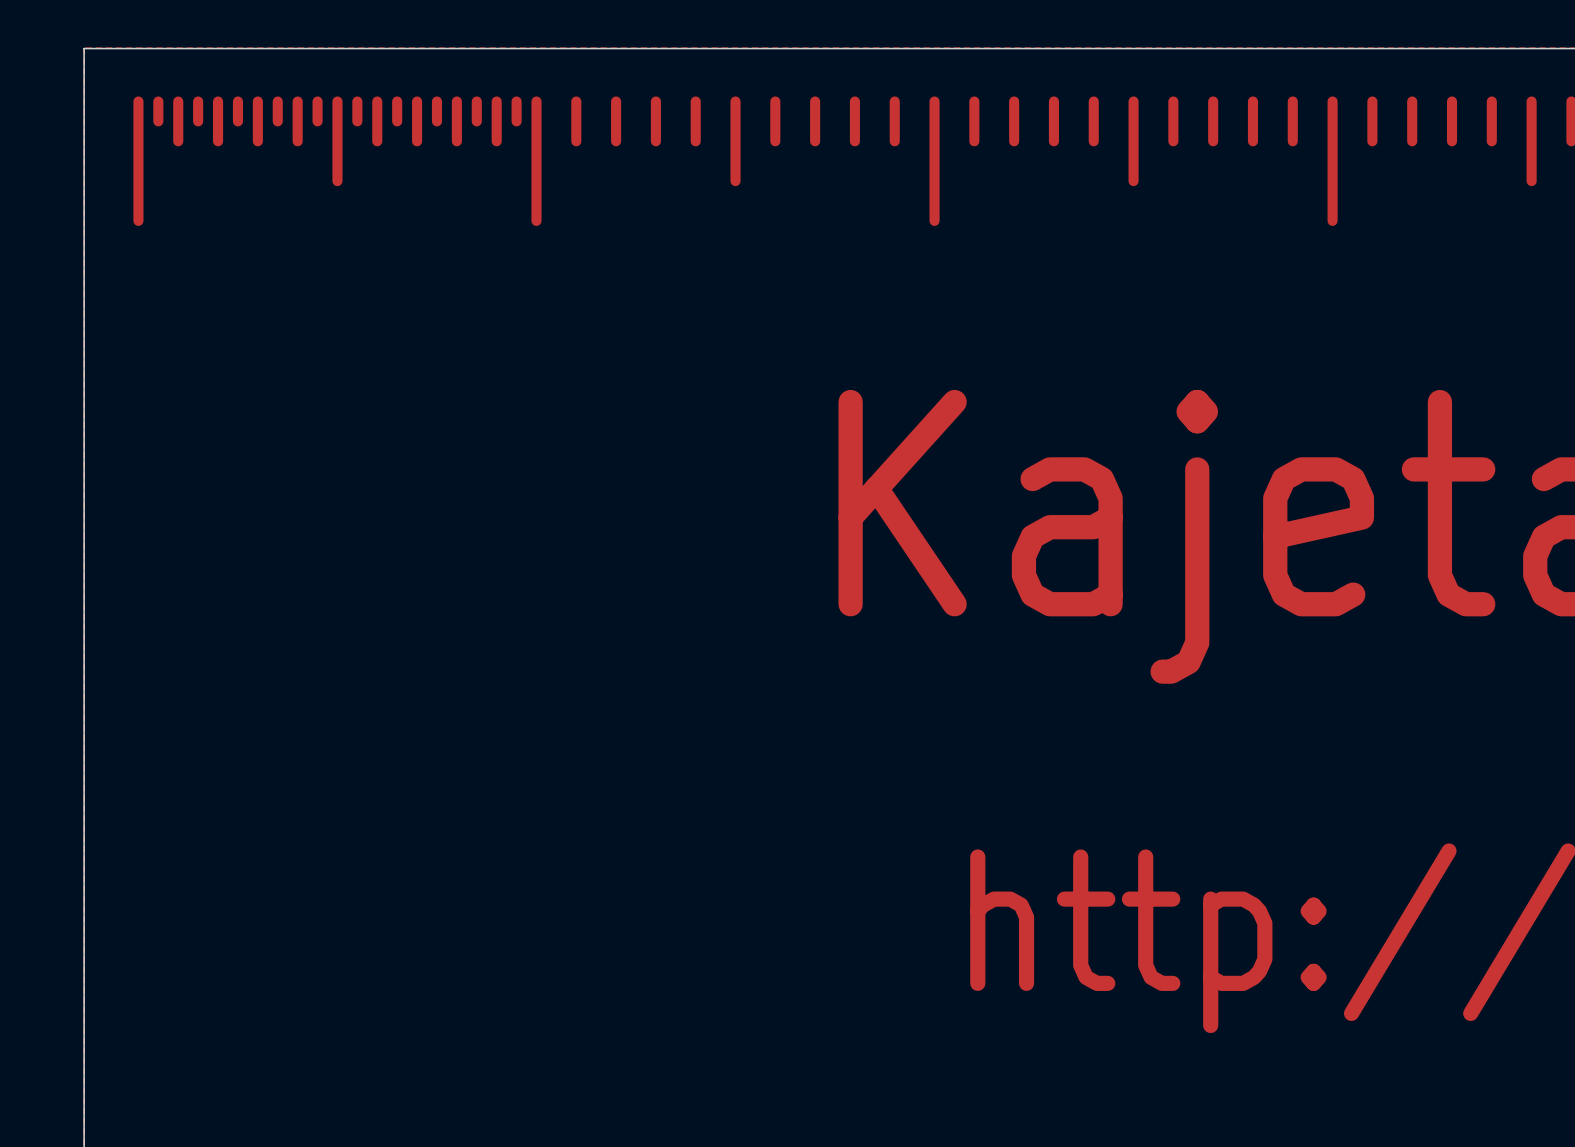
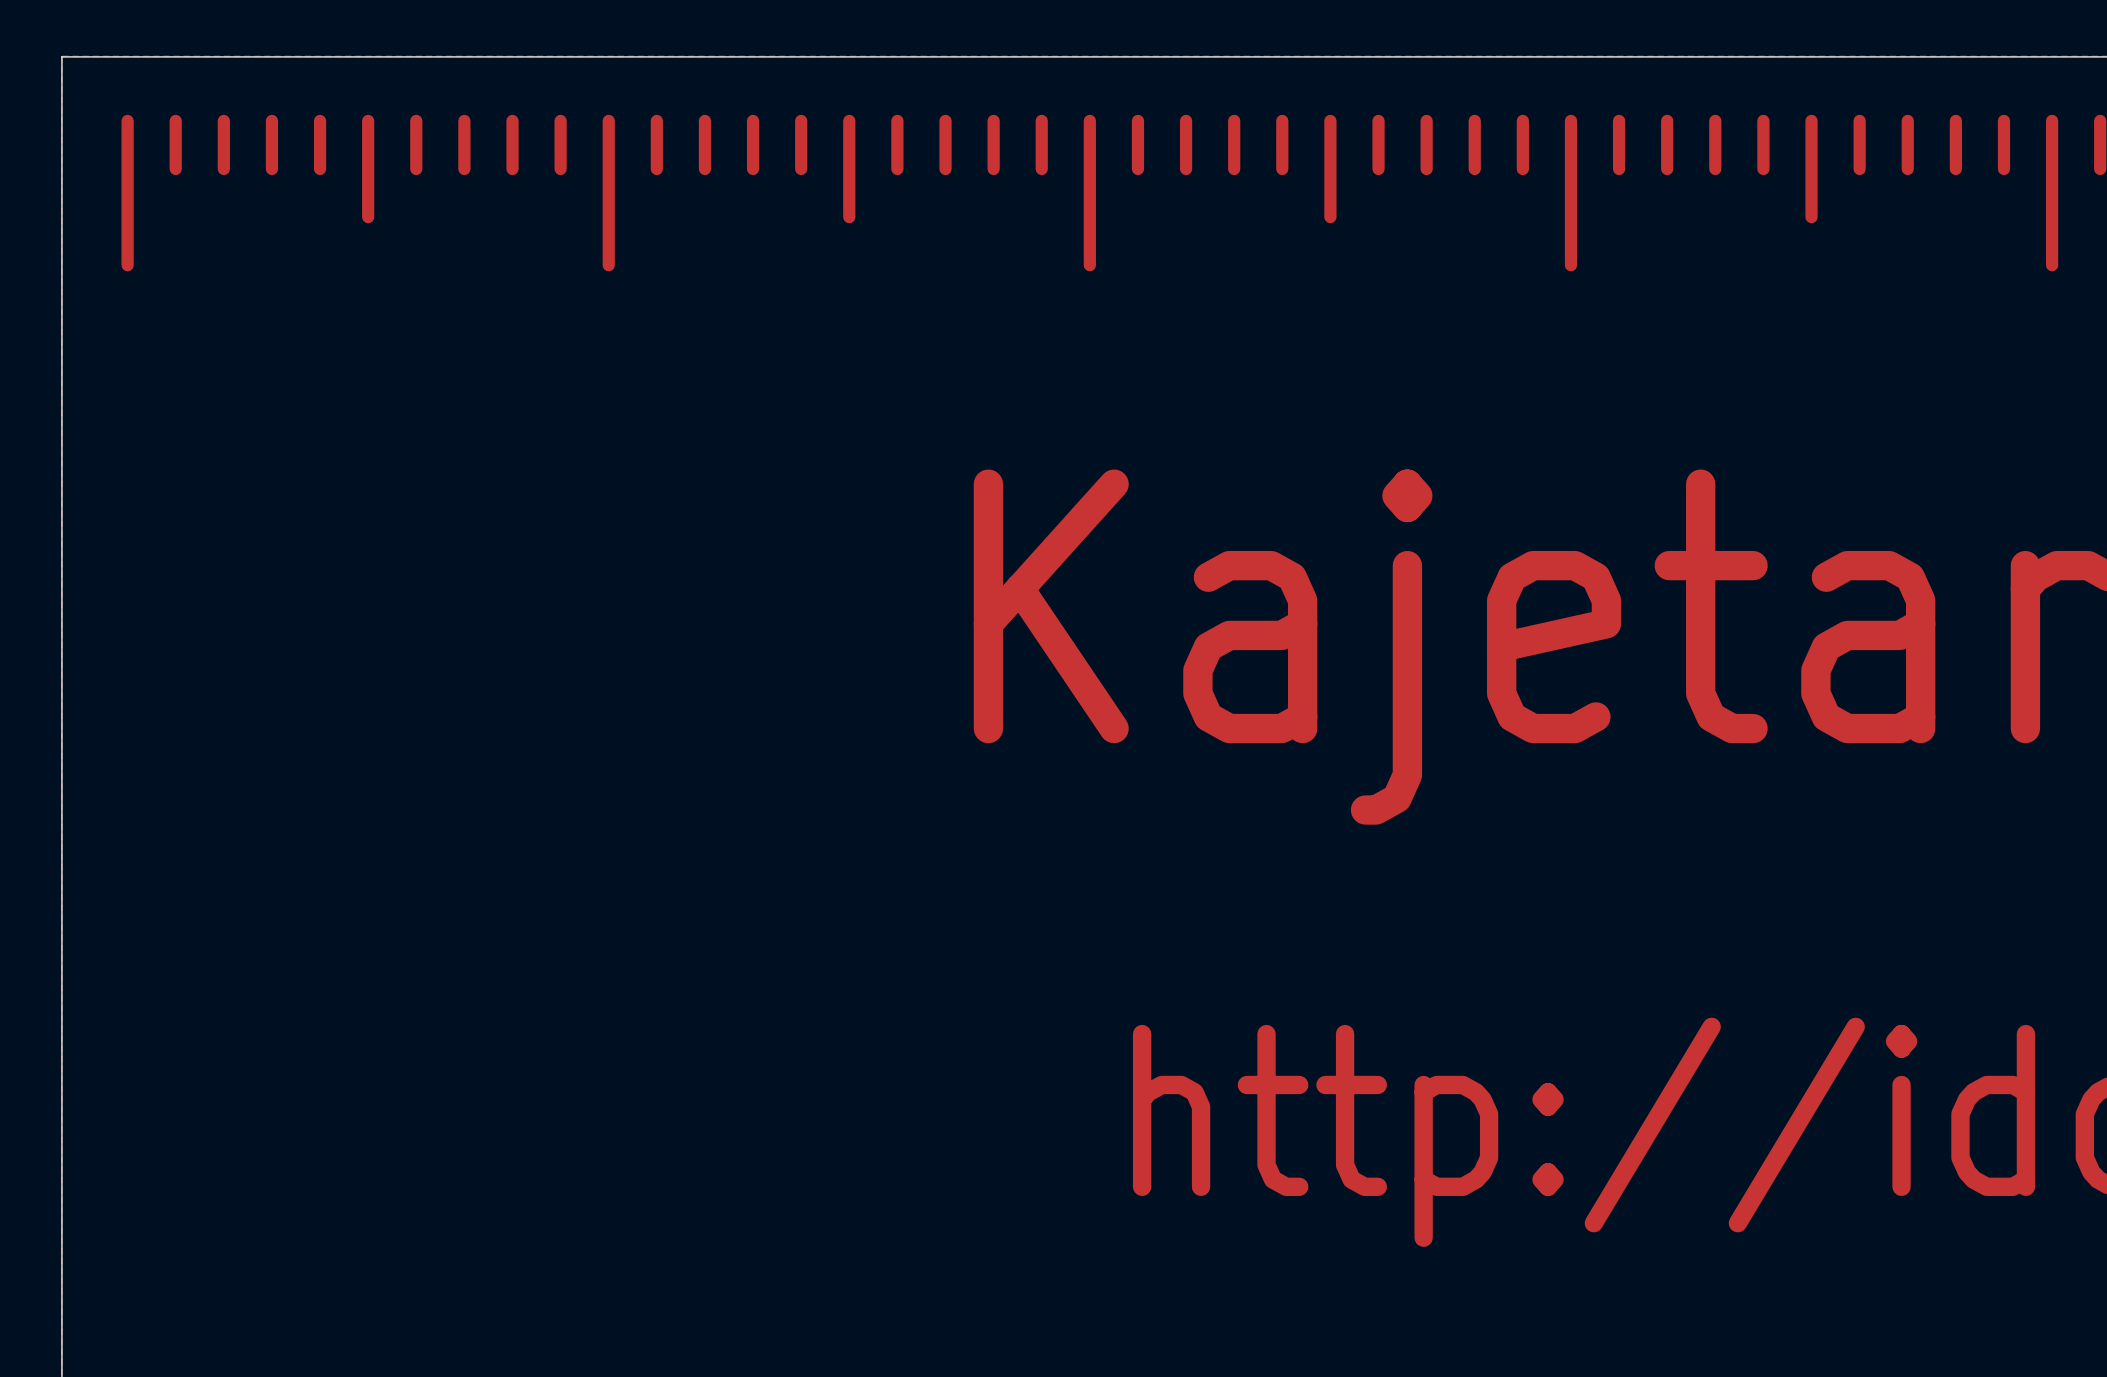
top track: (158, 101) (158, 121) -> none
top track: (198, 101) (198, 121) -> none
top track: (237, 101) (237, 121) -> none
top track: (277, 101) (277, 121) -> none
top track: (317, 101) (317, 121) -> none
top track: (357, 101) (357, 121) -> none
top track: (397, 101) (397, 121) -> none
top track: (436, 101) (436, 121) -> none
top track: (476, 101) (476, 121) -> none
top track: (516, 101) (516, 121) -> none

